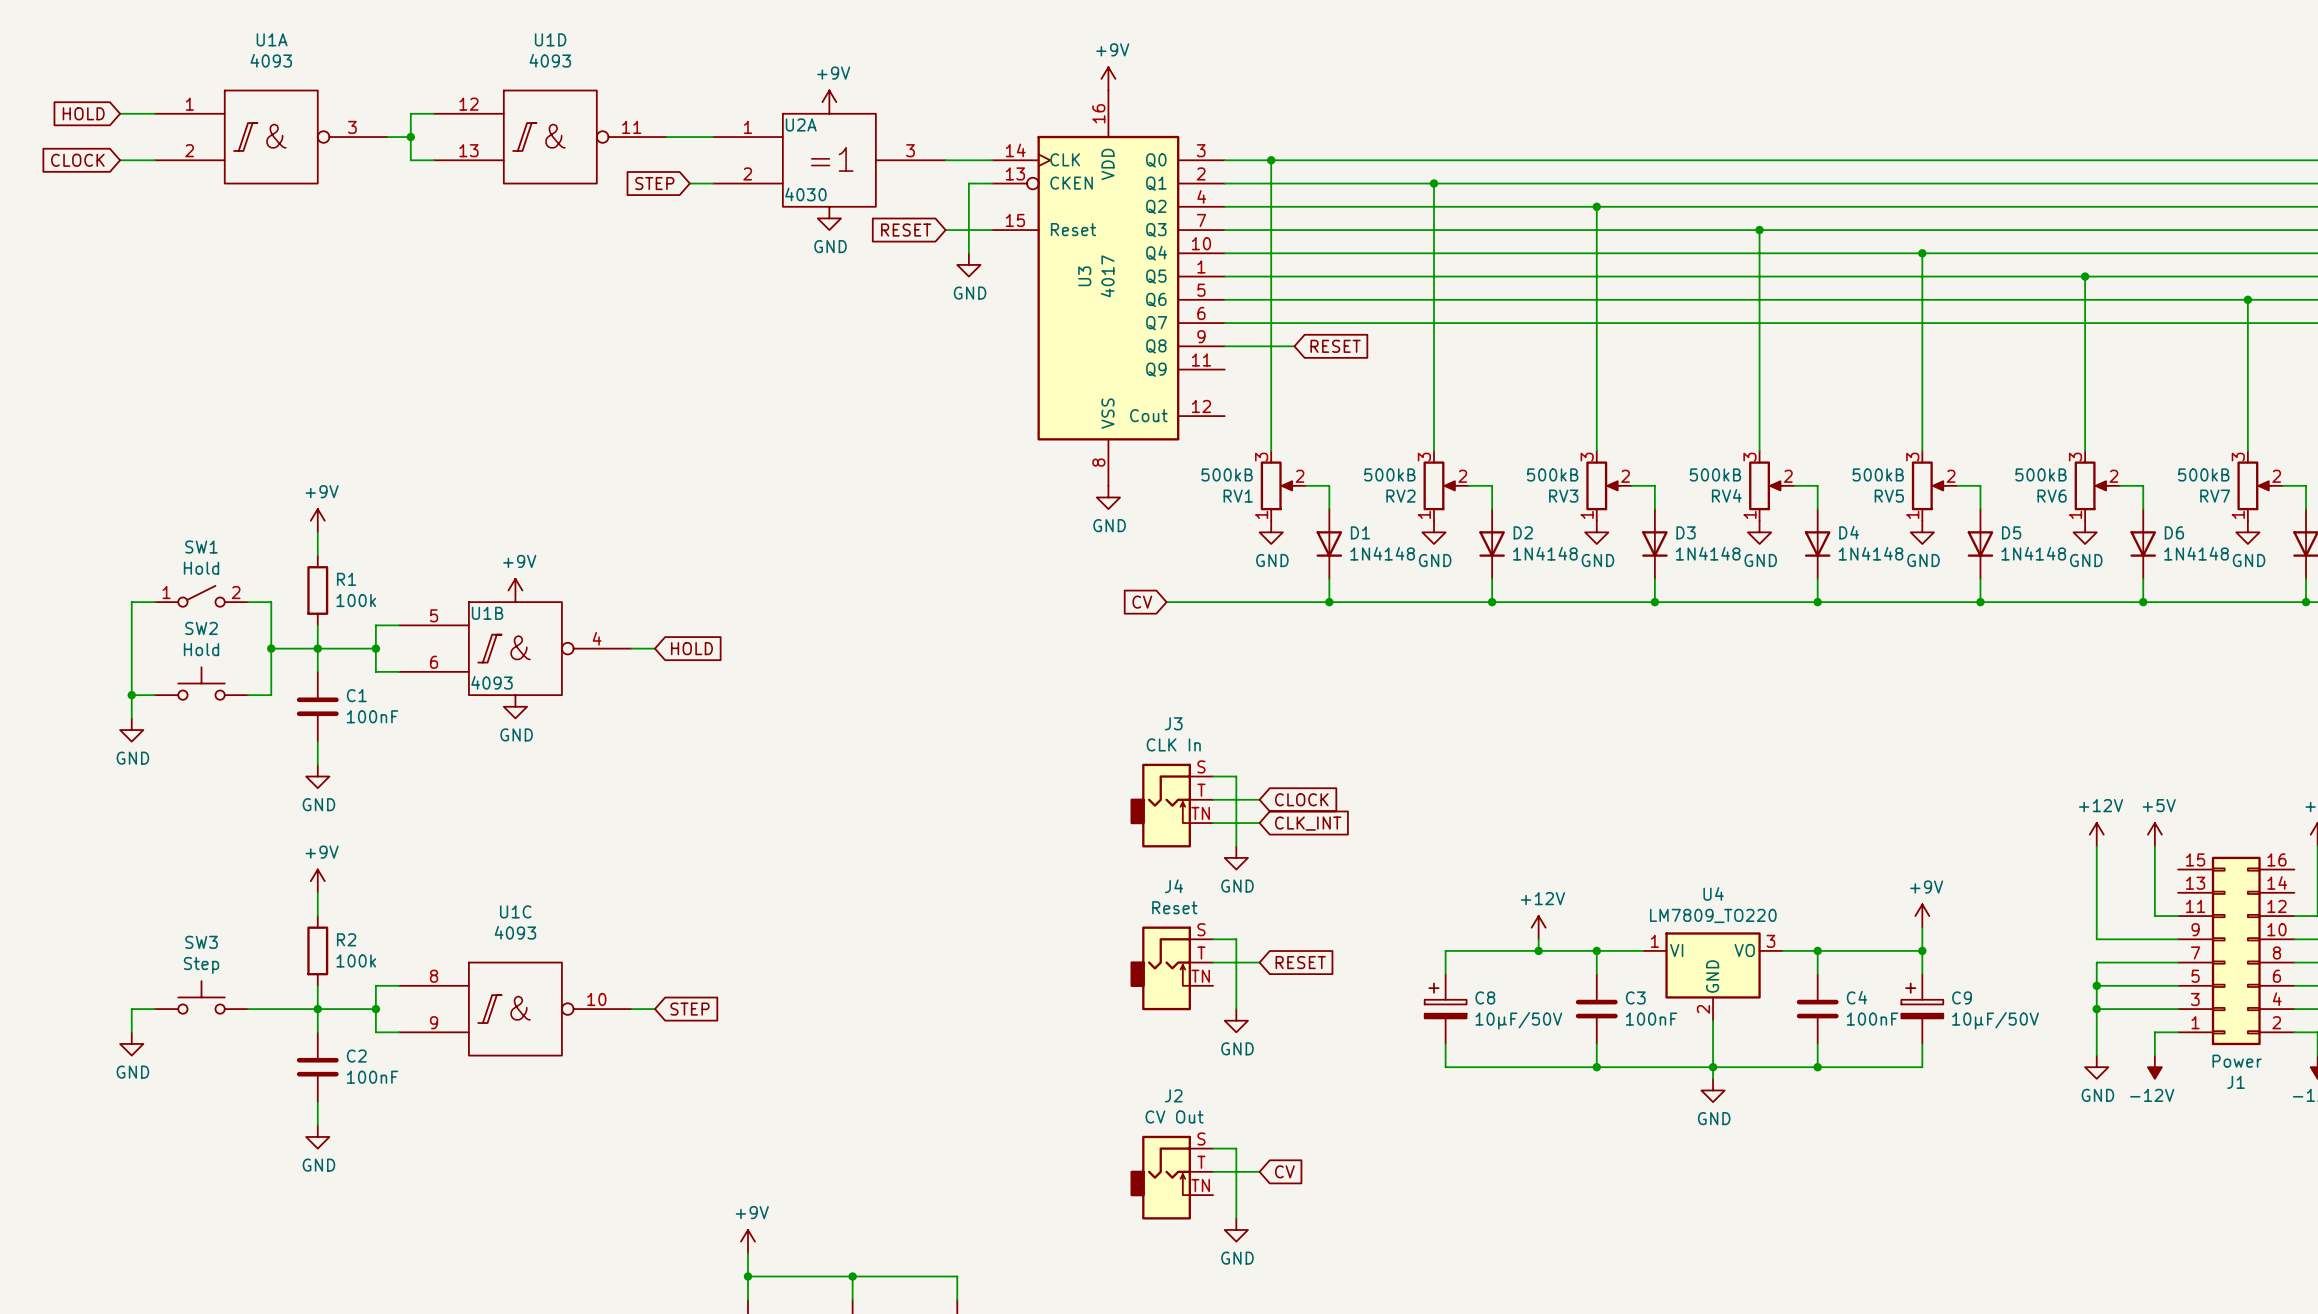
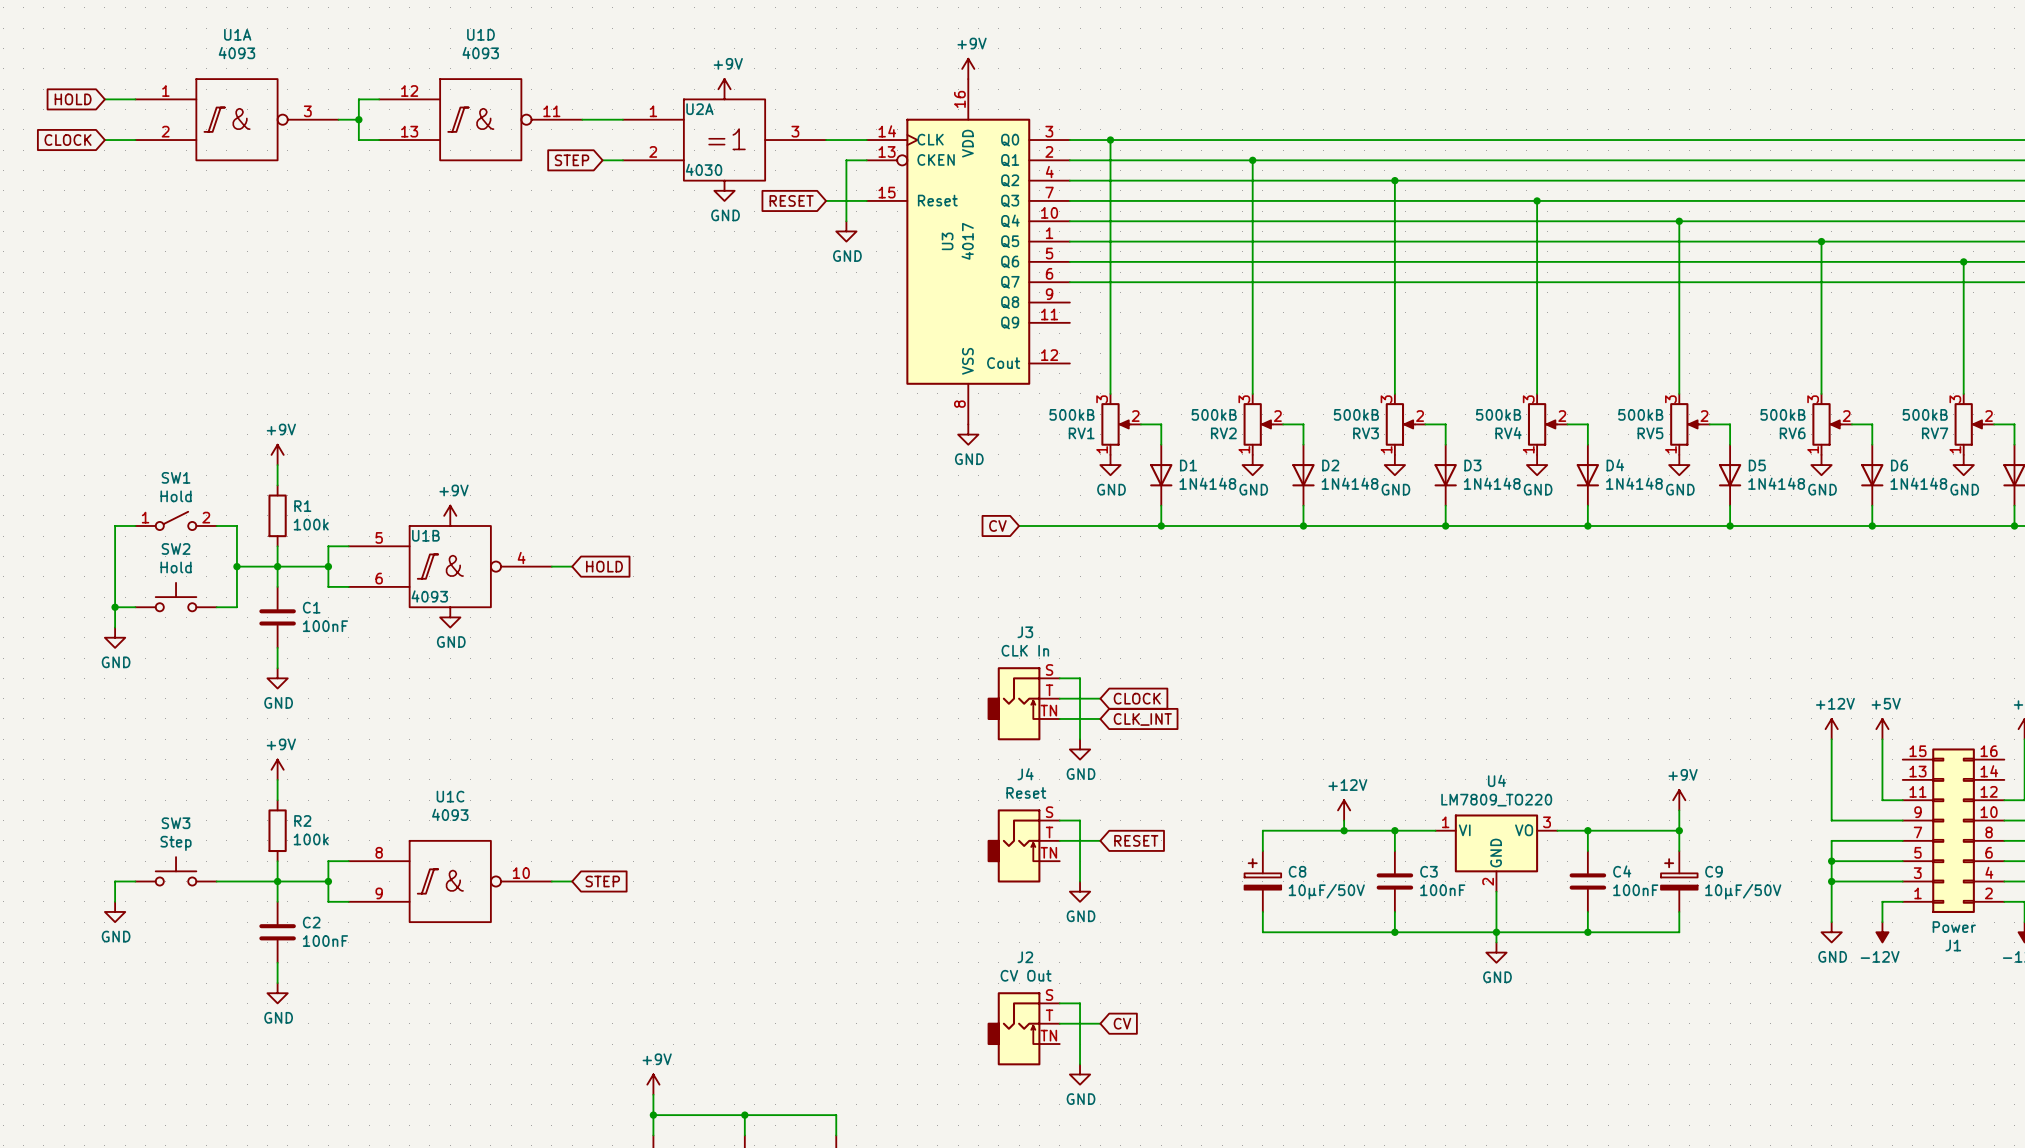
wire: (1224, 346) (1294, 346) -> none
global label: RESET (1335, 346) -> none

